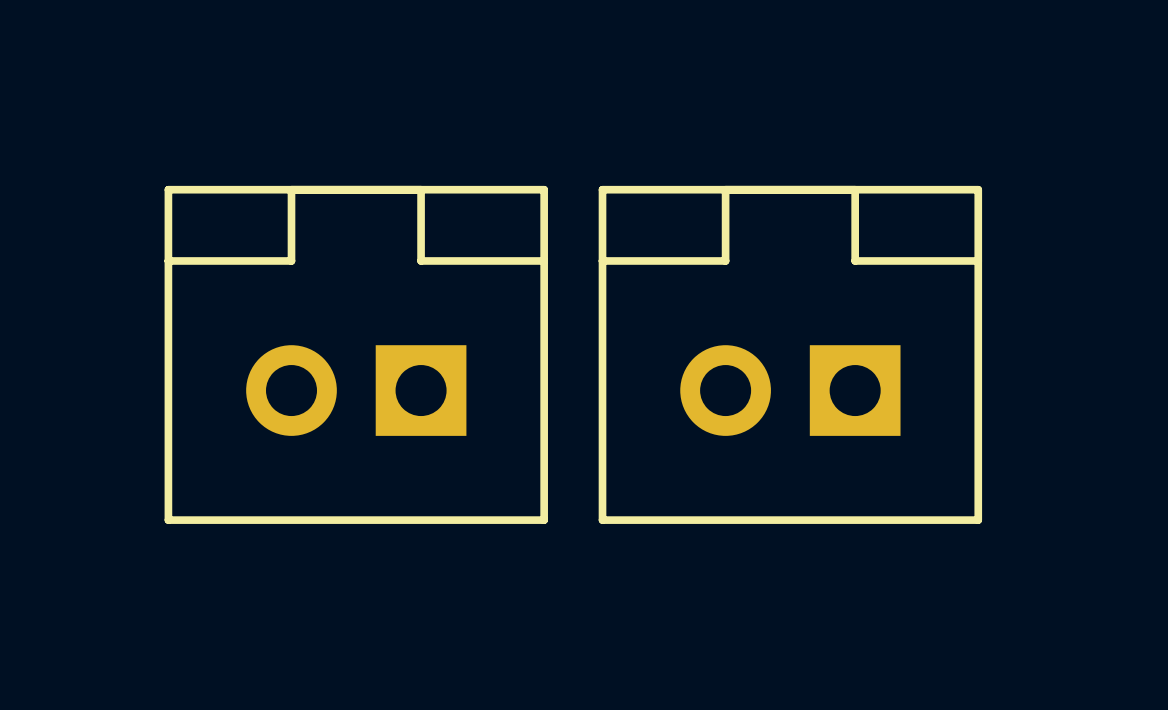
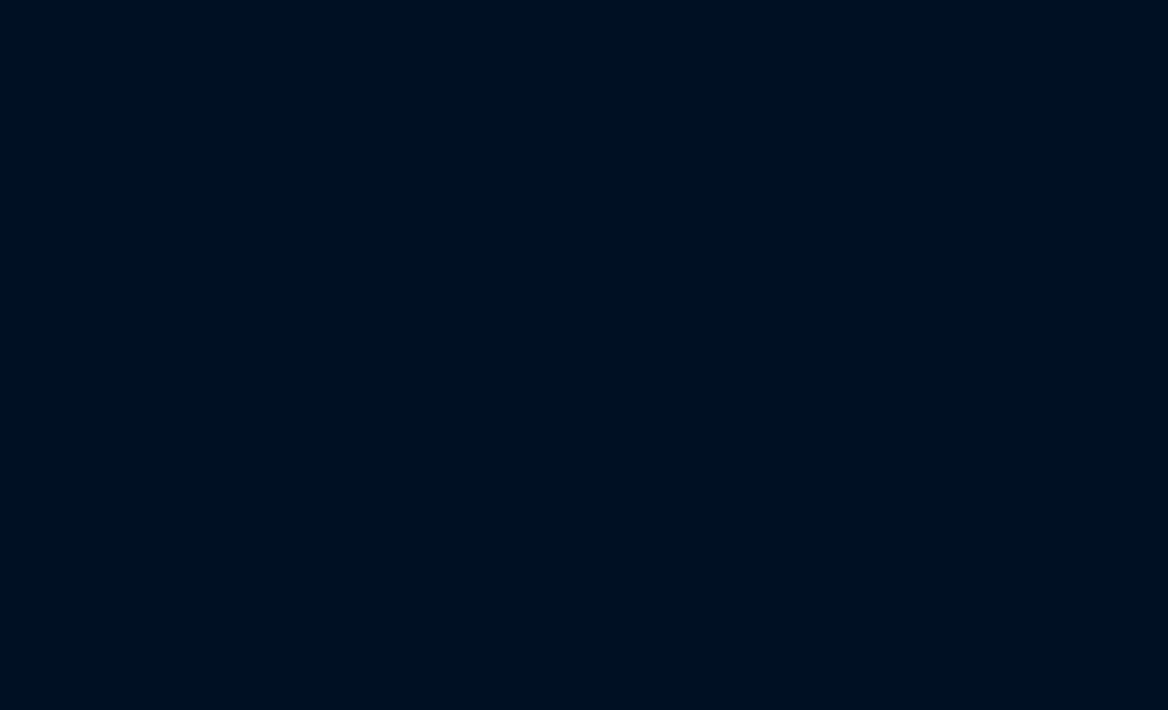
part: (356, 354) -> none
part: (790, 354) -> none

